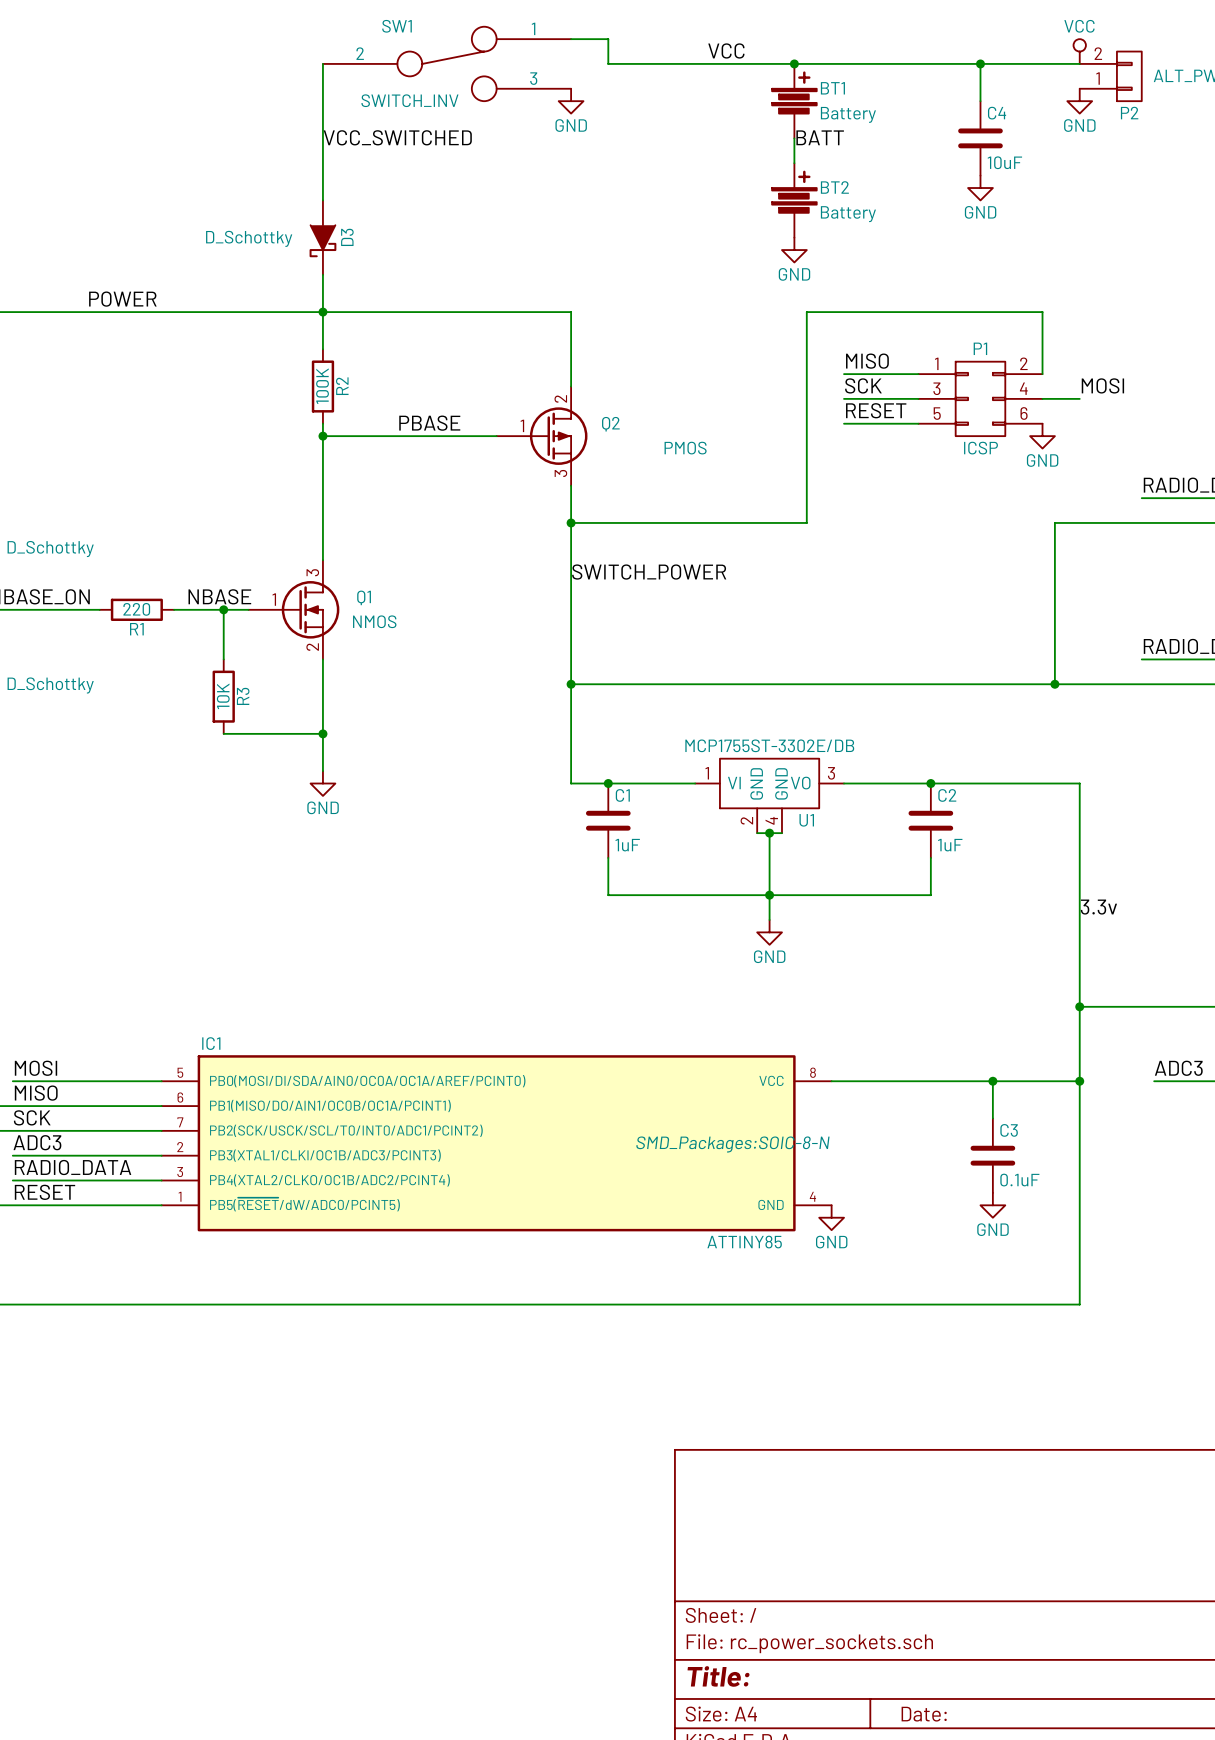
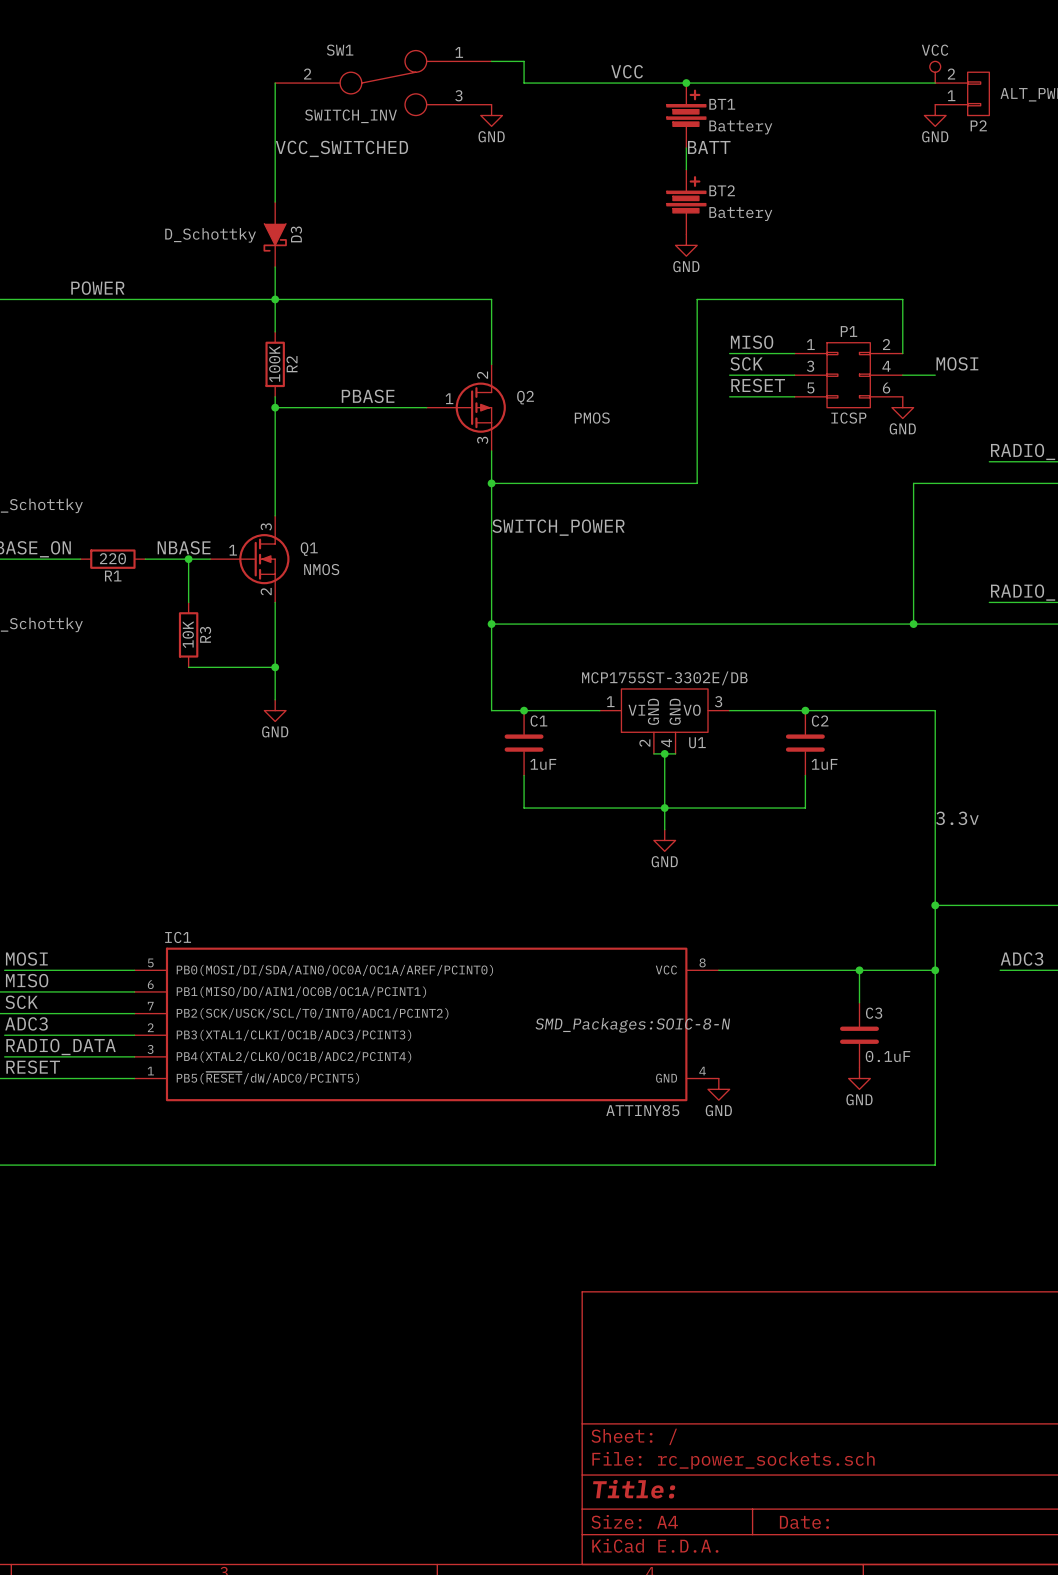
wire: (980, 63) (980, 101) -> none
junction: (980, 63) -> none
C4: 10uF (980, 138) -> none
power symbol: GND (980, 188) -> none

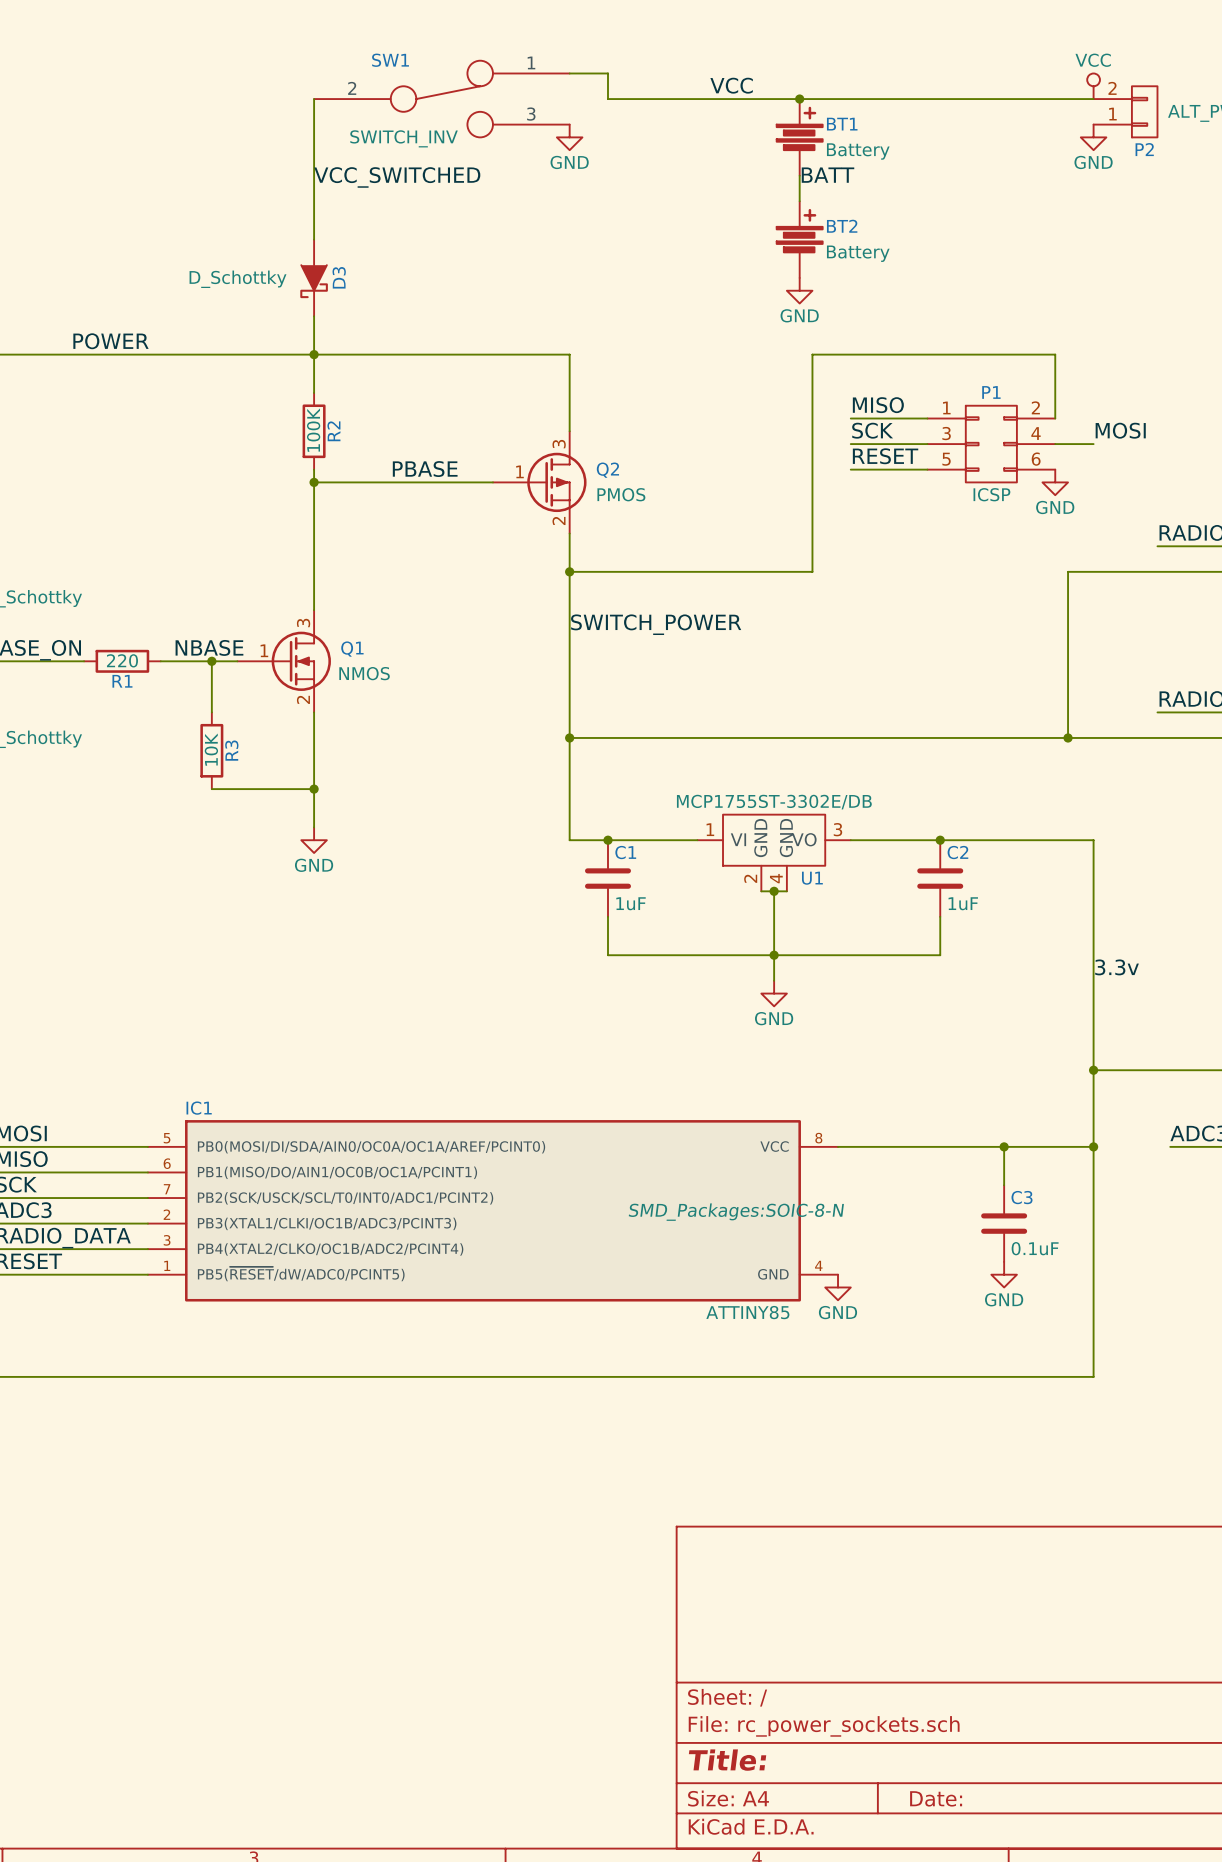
Q2 pin number: 2 (482, 375) -> 3 (559, 444)
Q2 value position: PMOS (592, 418) -> PMOS (621, 494)
Q2 pin number: 3 (482, 440) -> 2 (559, 520)

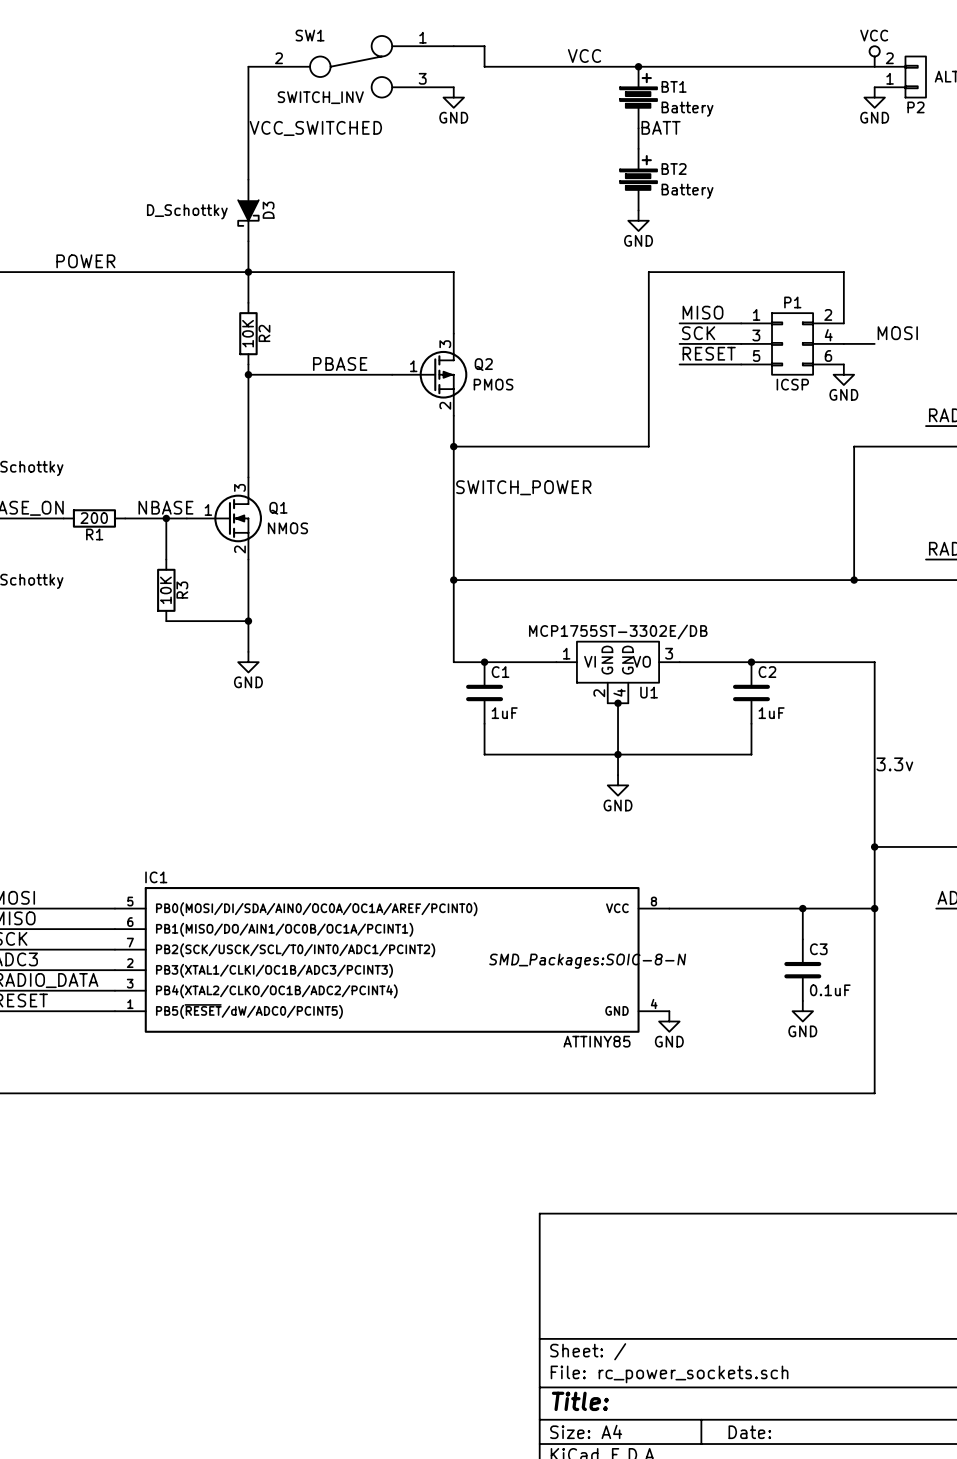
R2 value: 100K (313, 430) -> 10K (248, 333)
R1 value: 220 (122, 660) -> 200 (94, 518)

